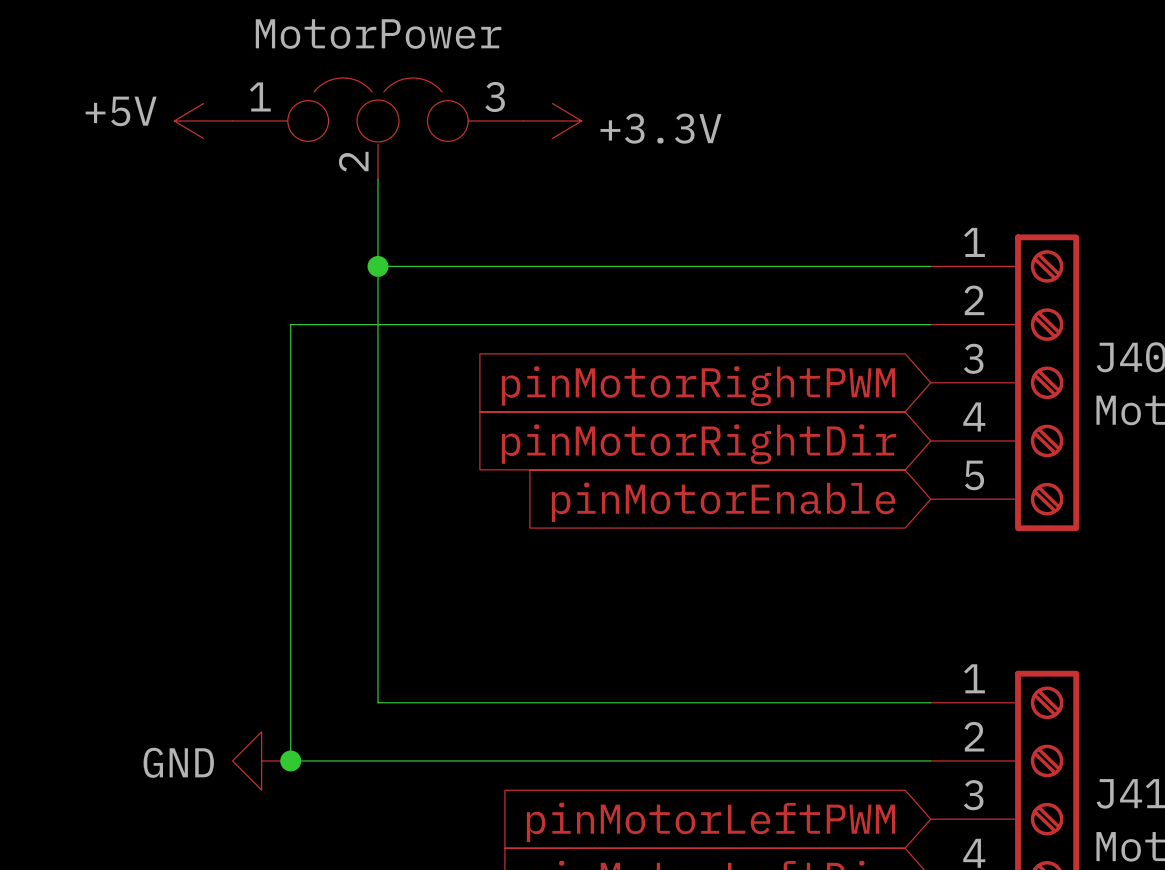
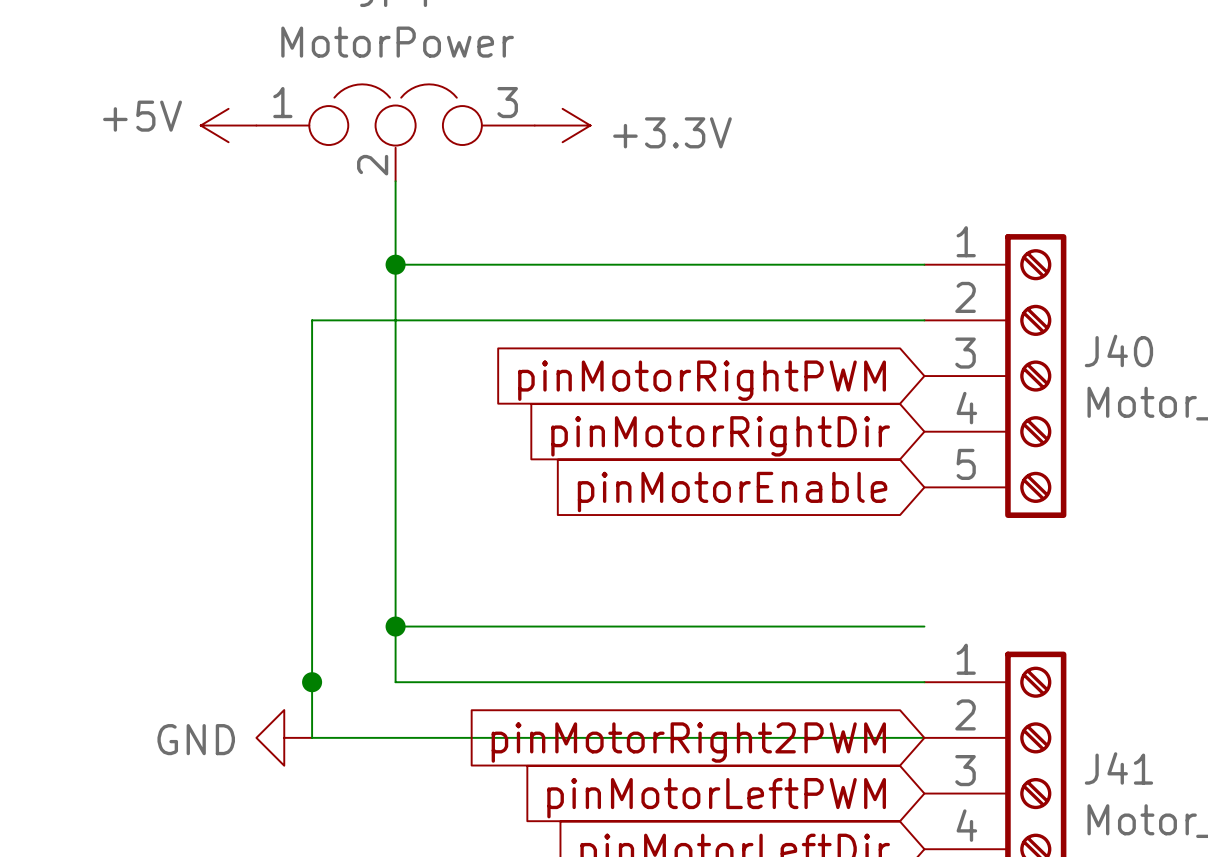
wire: none -> (395, 626) (924, 626)
junction: none -> (395, 626)
junction position: (290, 760) -> (312, 682)
global label: none -> pinMotorRight2PWM (688, 742)

